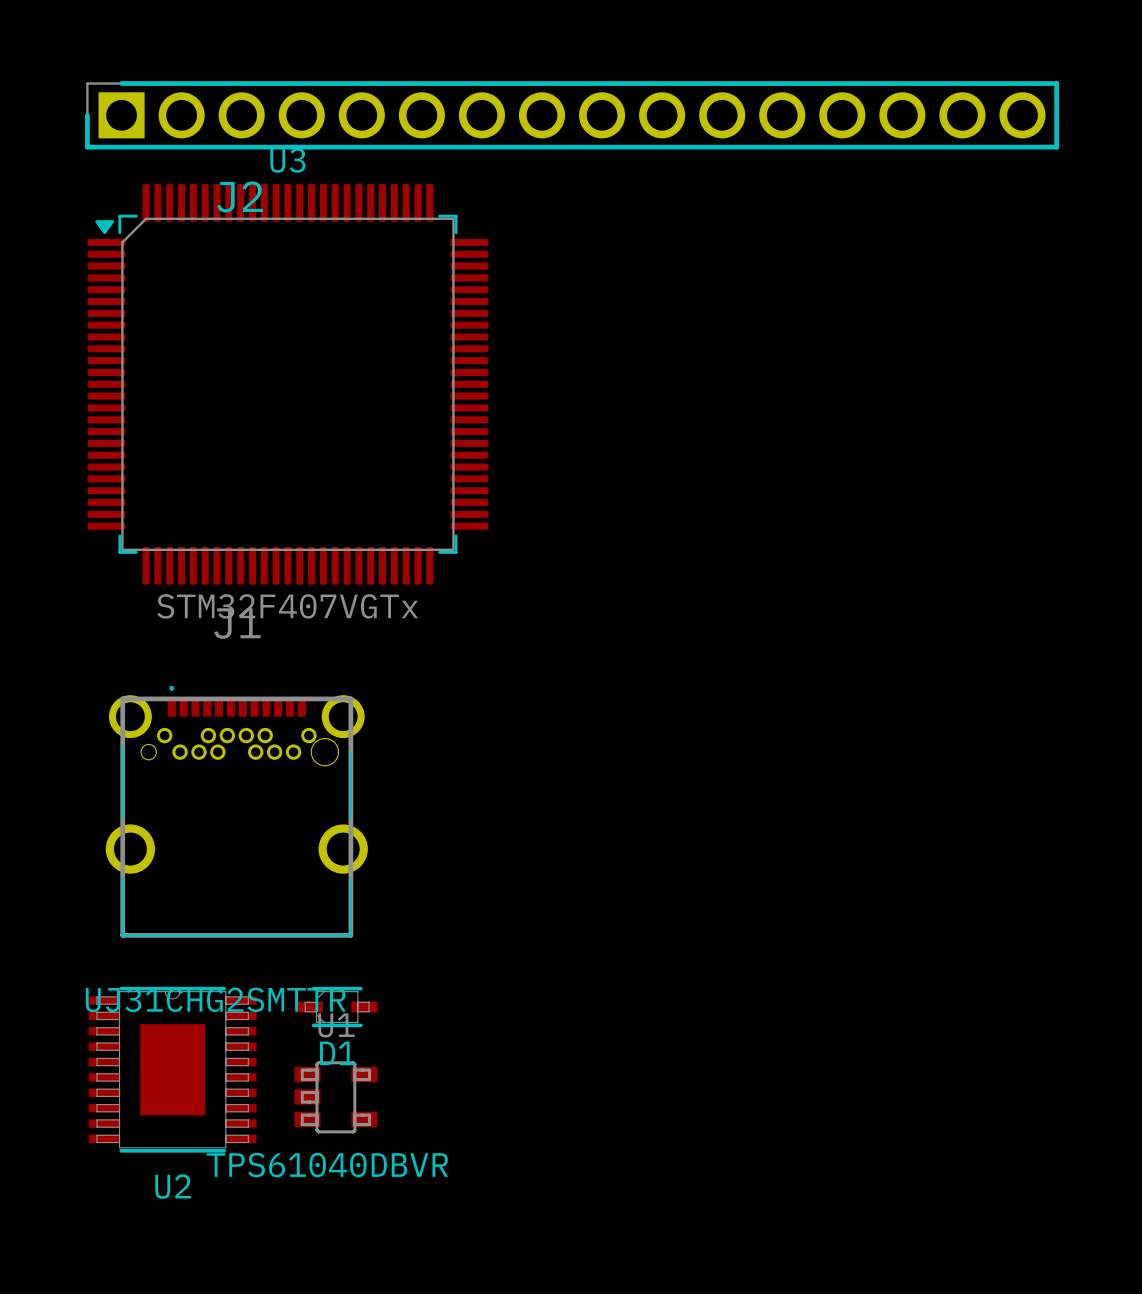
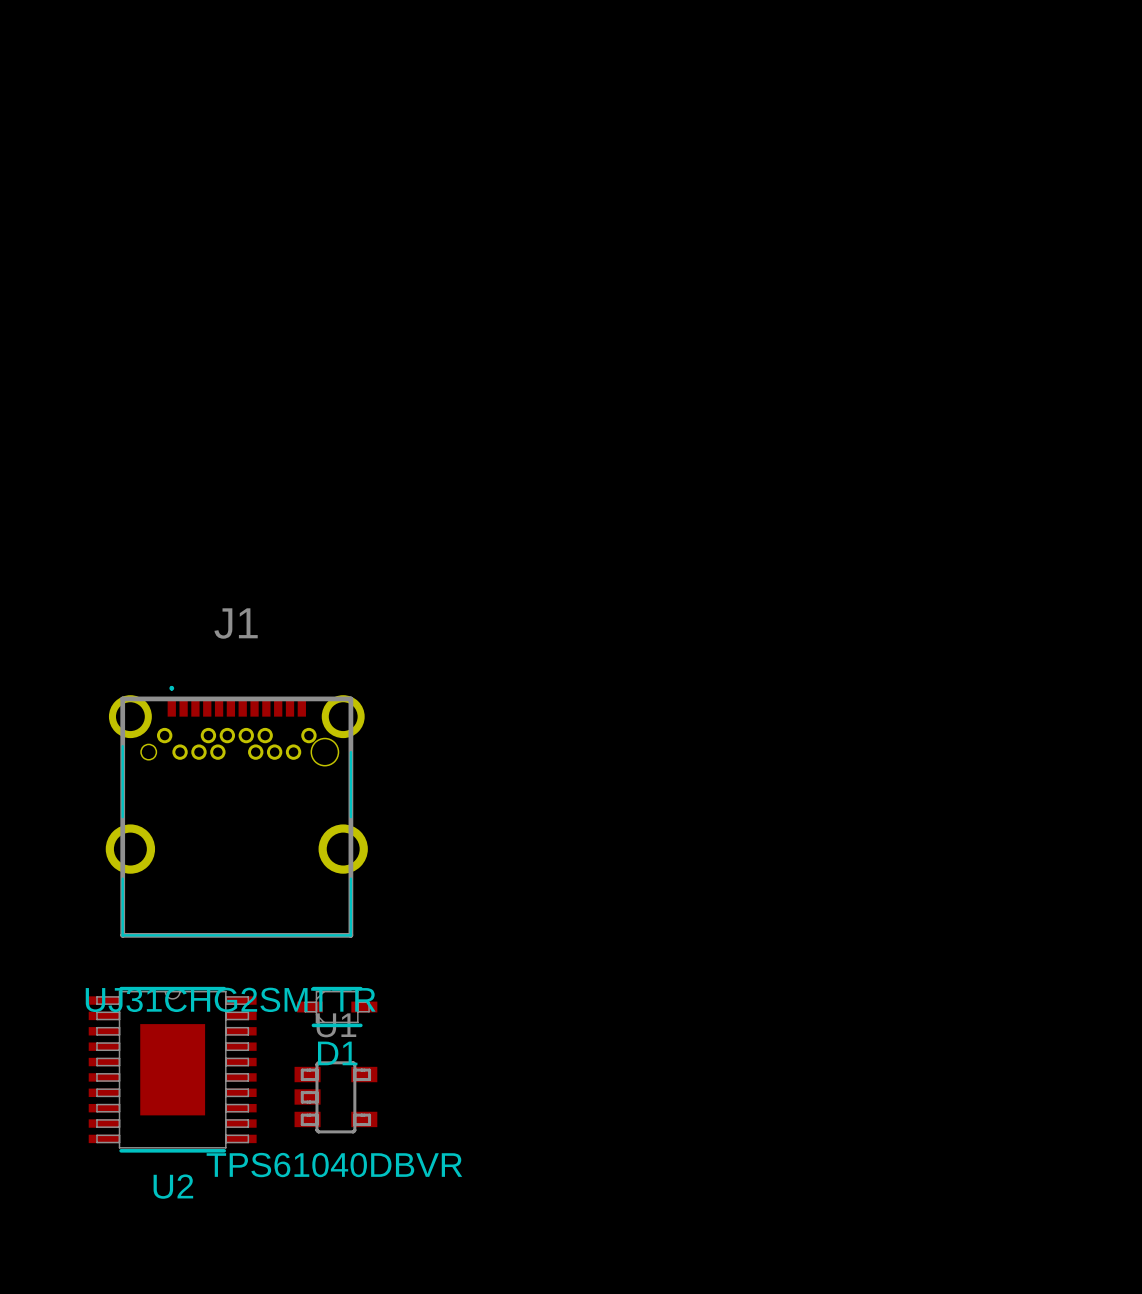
J2: (572, 115) -> none
U3: STM32F407VGTx (287, 384) -> none

